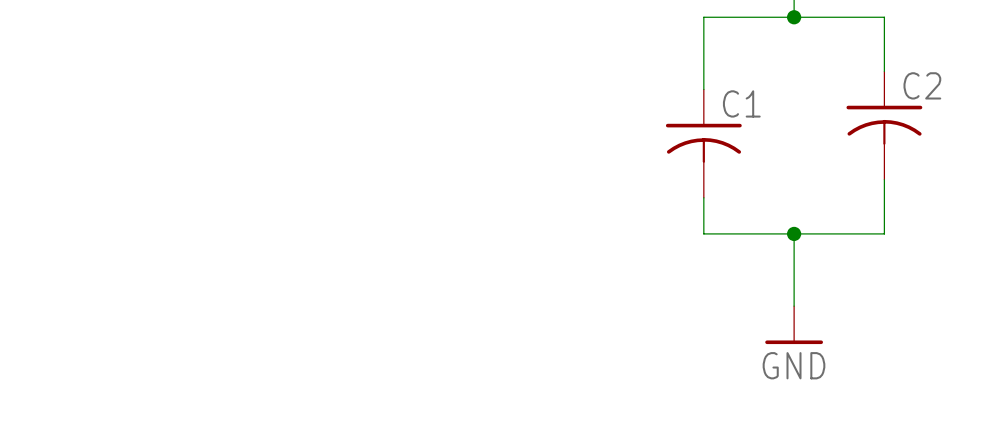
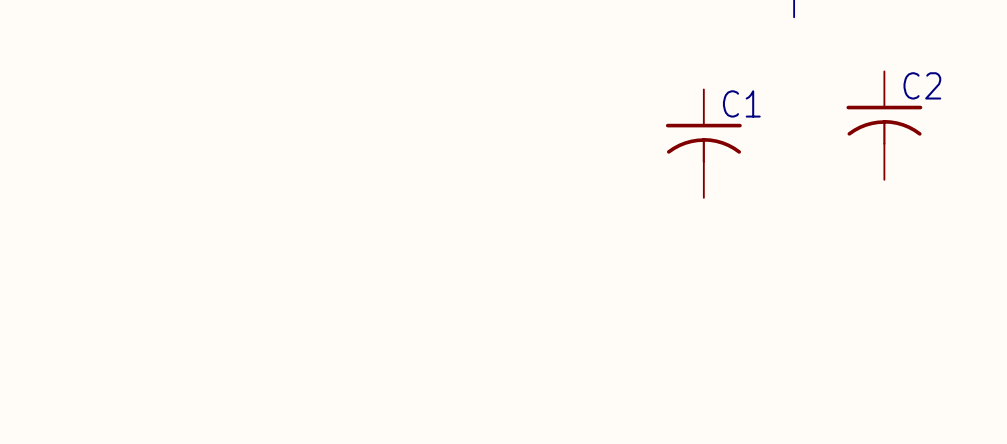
junction: (794, 17) -> none
wire: (884, 71) (884, 17) (703, 17) (703, 89) -> none
wire: (884, 179) (884, 233) (703, 233) (703, 197) -> none
wire: (794, 233) (794, 306) -> none
junction: (794, 233) -> none
power symbol: GND (794, 325) -> none

